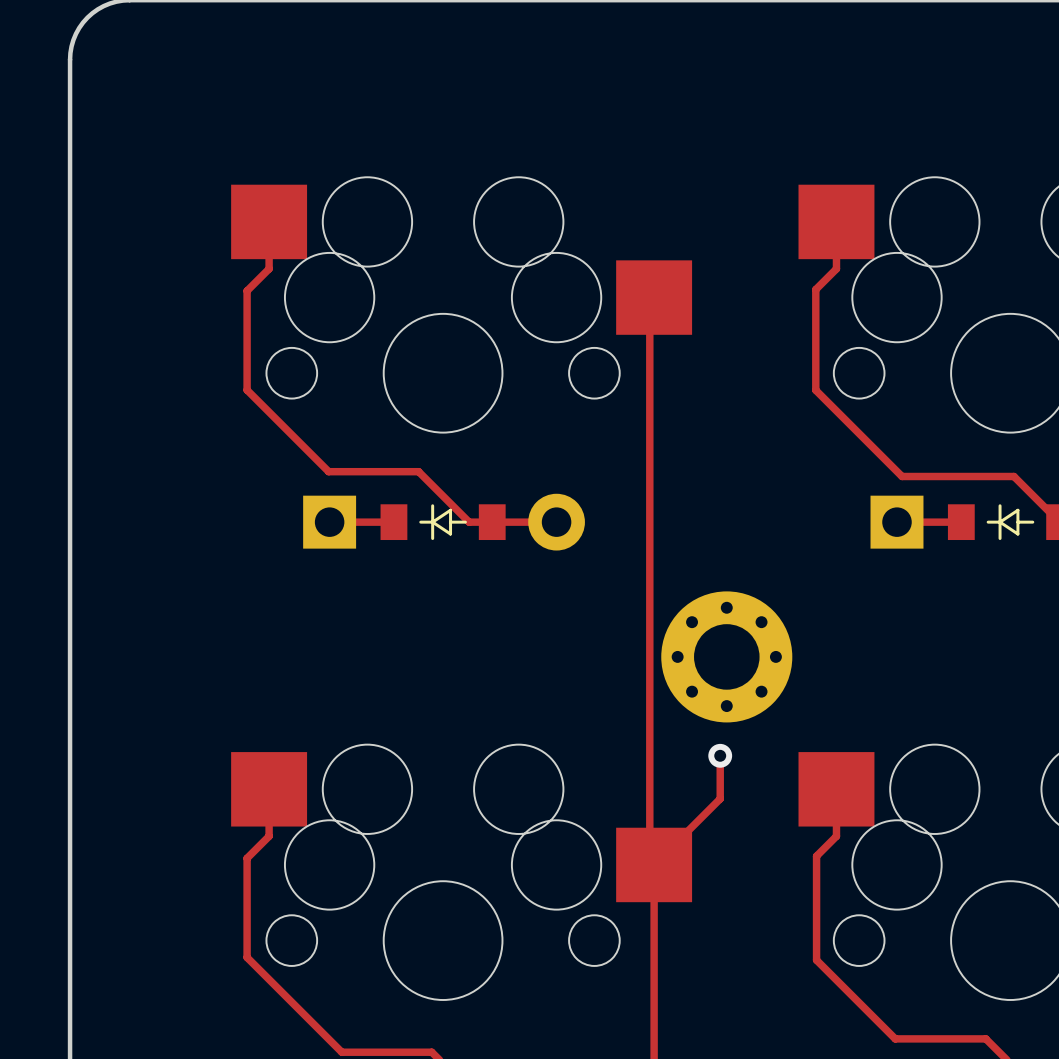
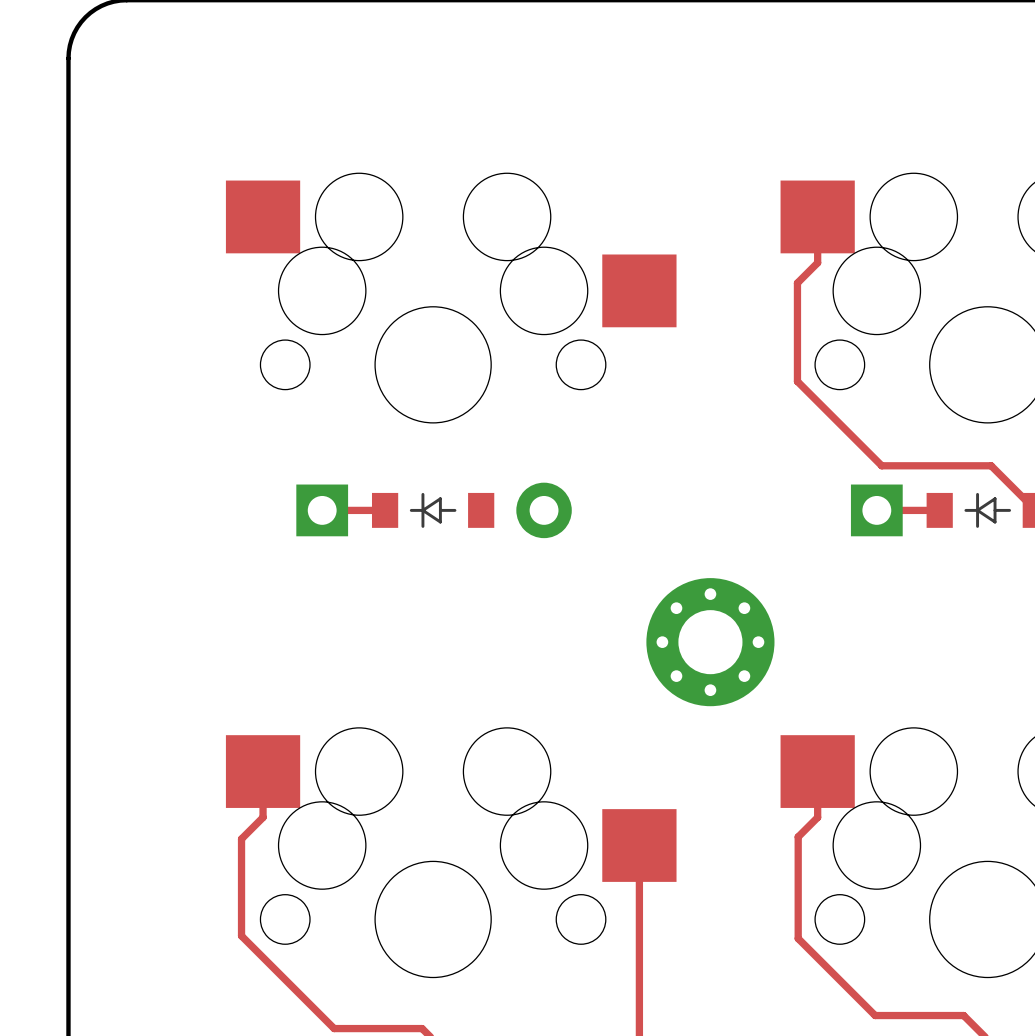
track: (269, 221) (269, 268) (247, 290) (247, 390) (328, 471) (418, 471) (469, 522) (556, 522) -> none
track: (654, 297) (649, 301) (649, 860) (654, 864) (720, 798) (720, 755) -> none
via: (720, 755) -> none

